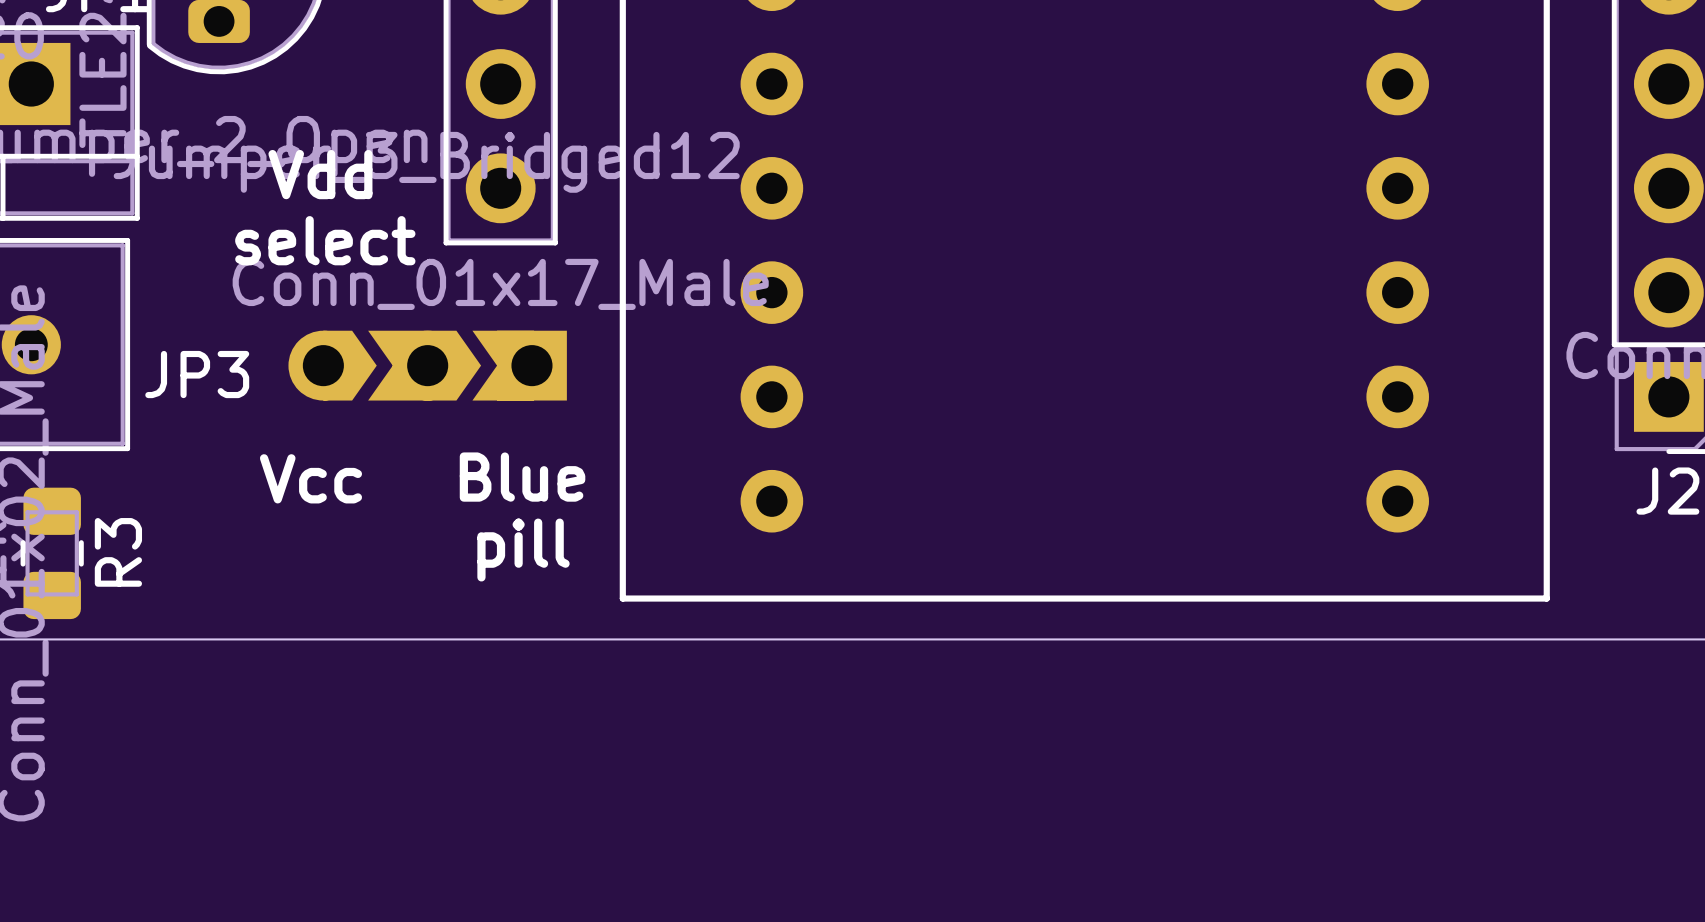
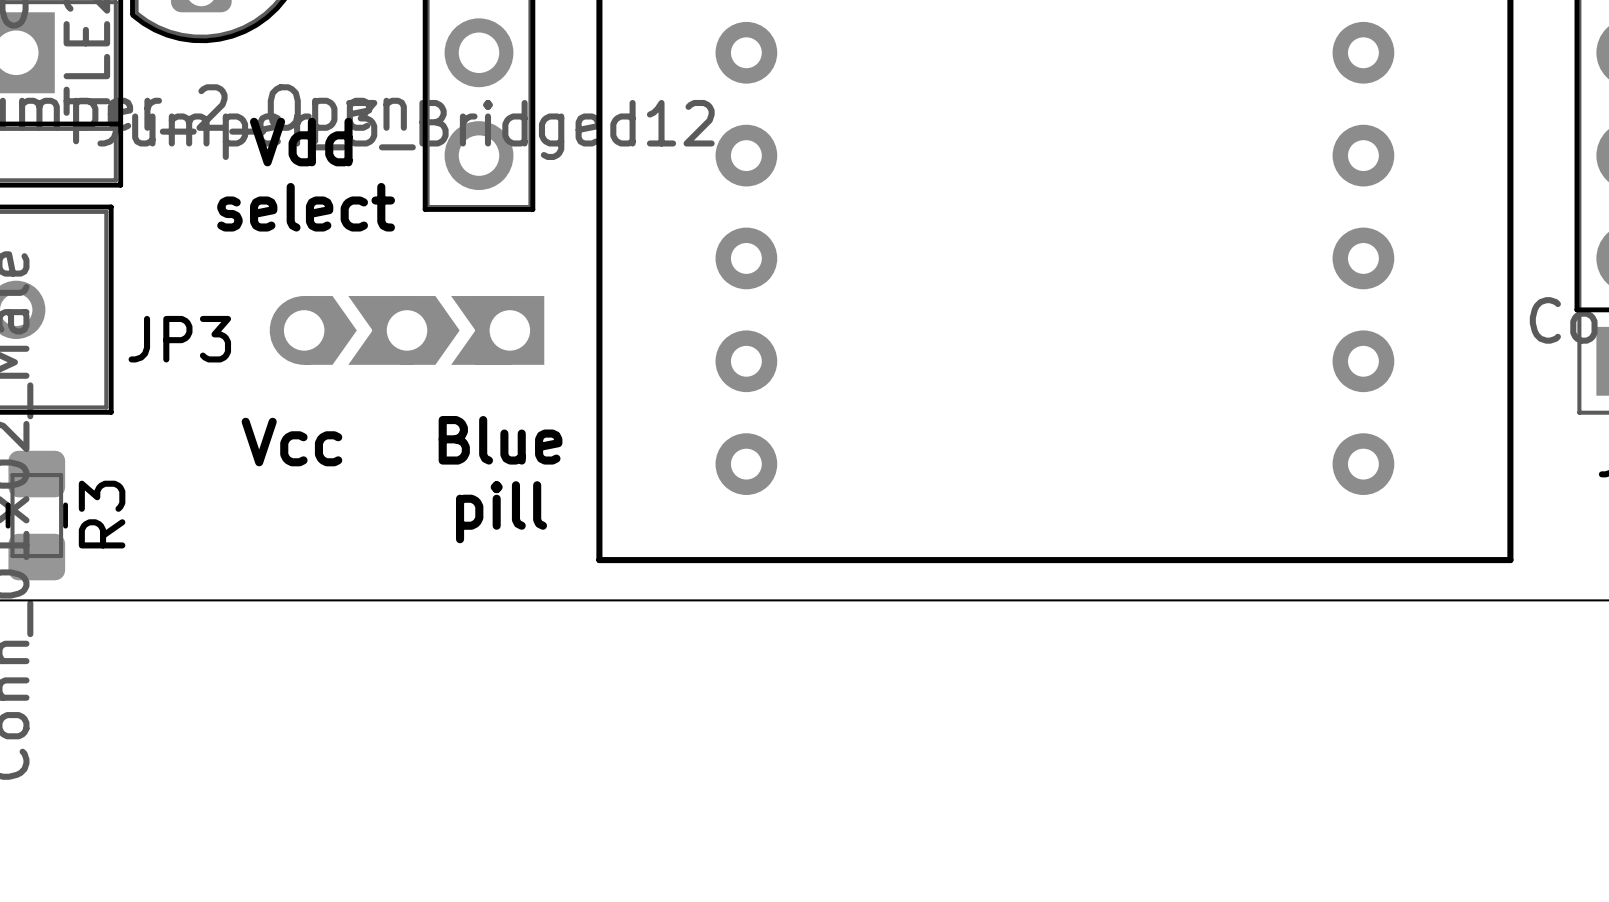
part value: Conn_01x17_Male (500, 284) -> none

